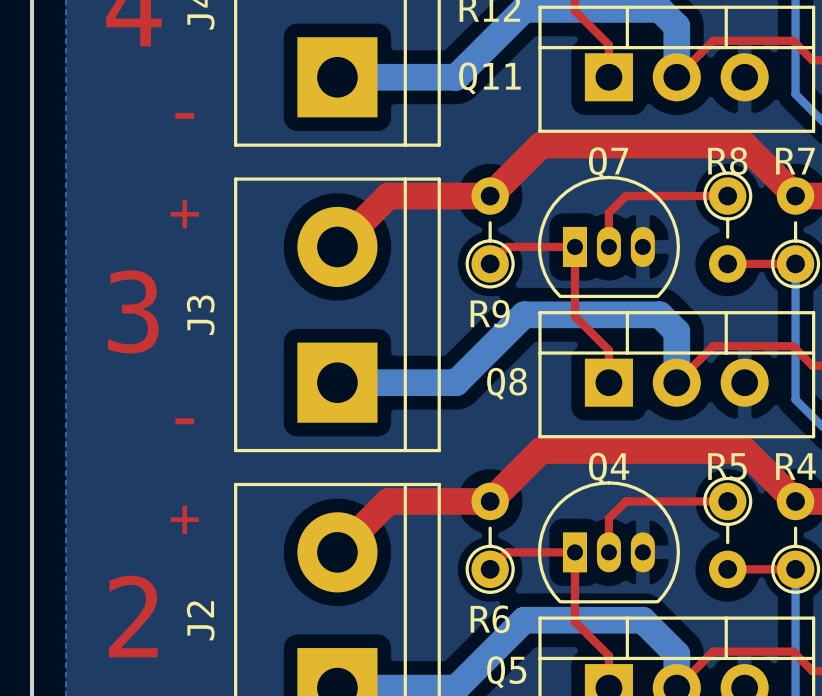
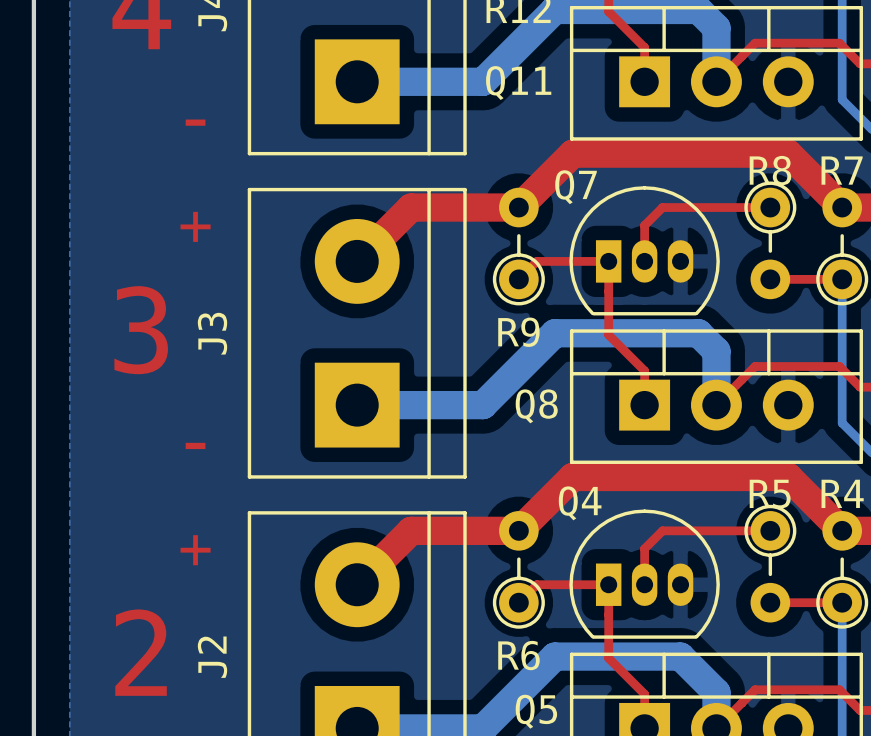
Q7 name position: Q7 (608, 163) -> Q7 (576, 187)
Q4 name position: Q4 (609, 468) -> Q4 (580, 503)

